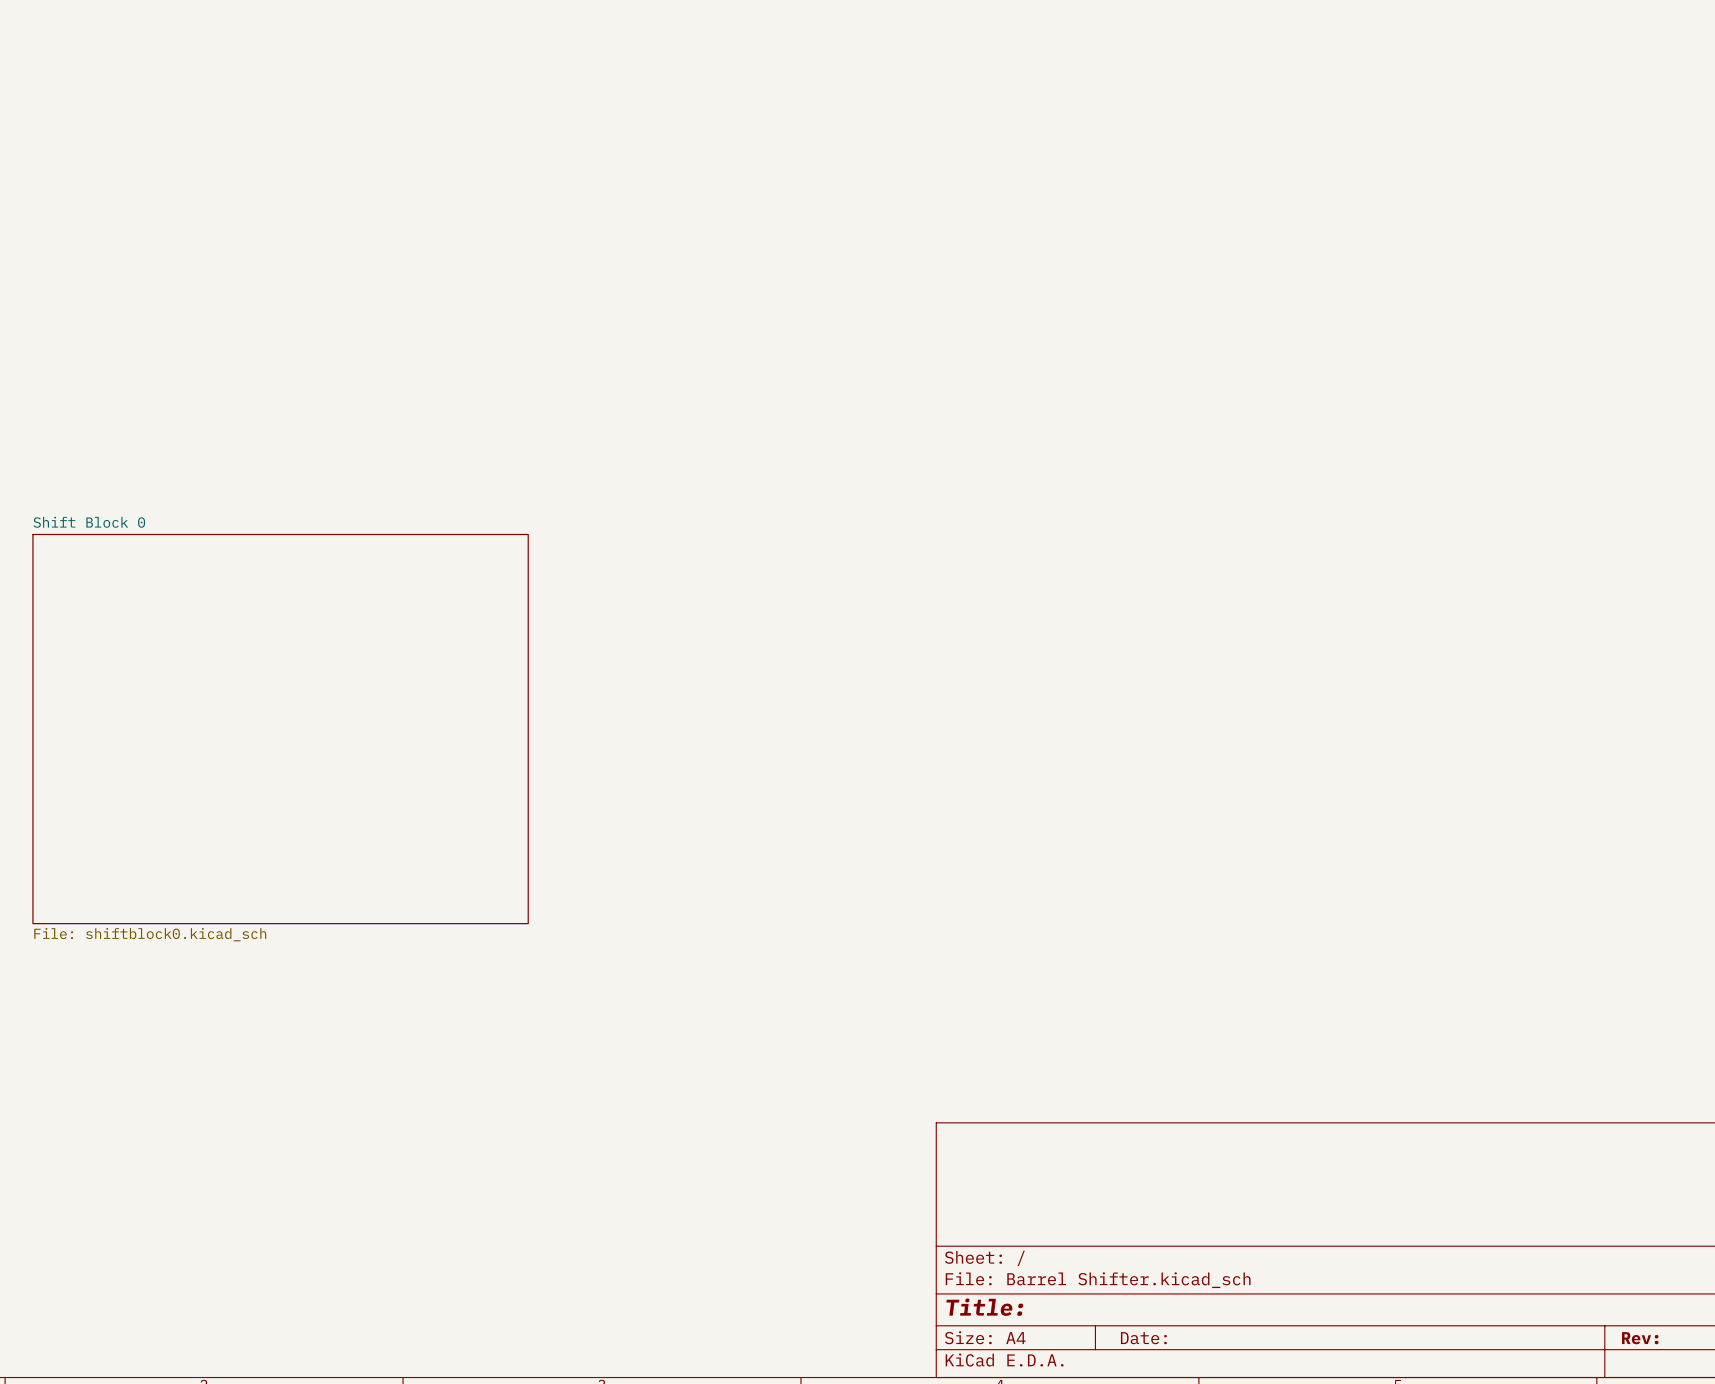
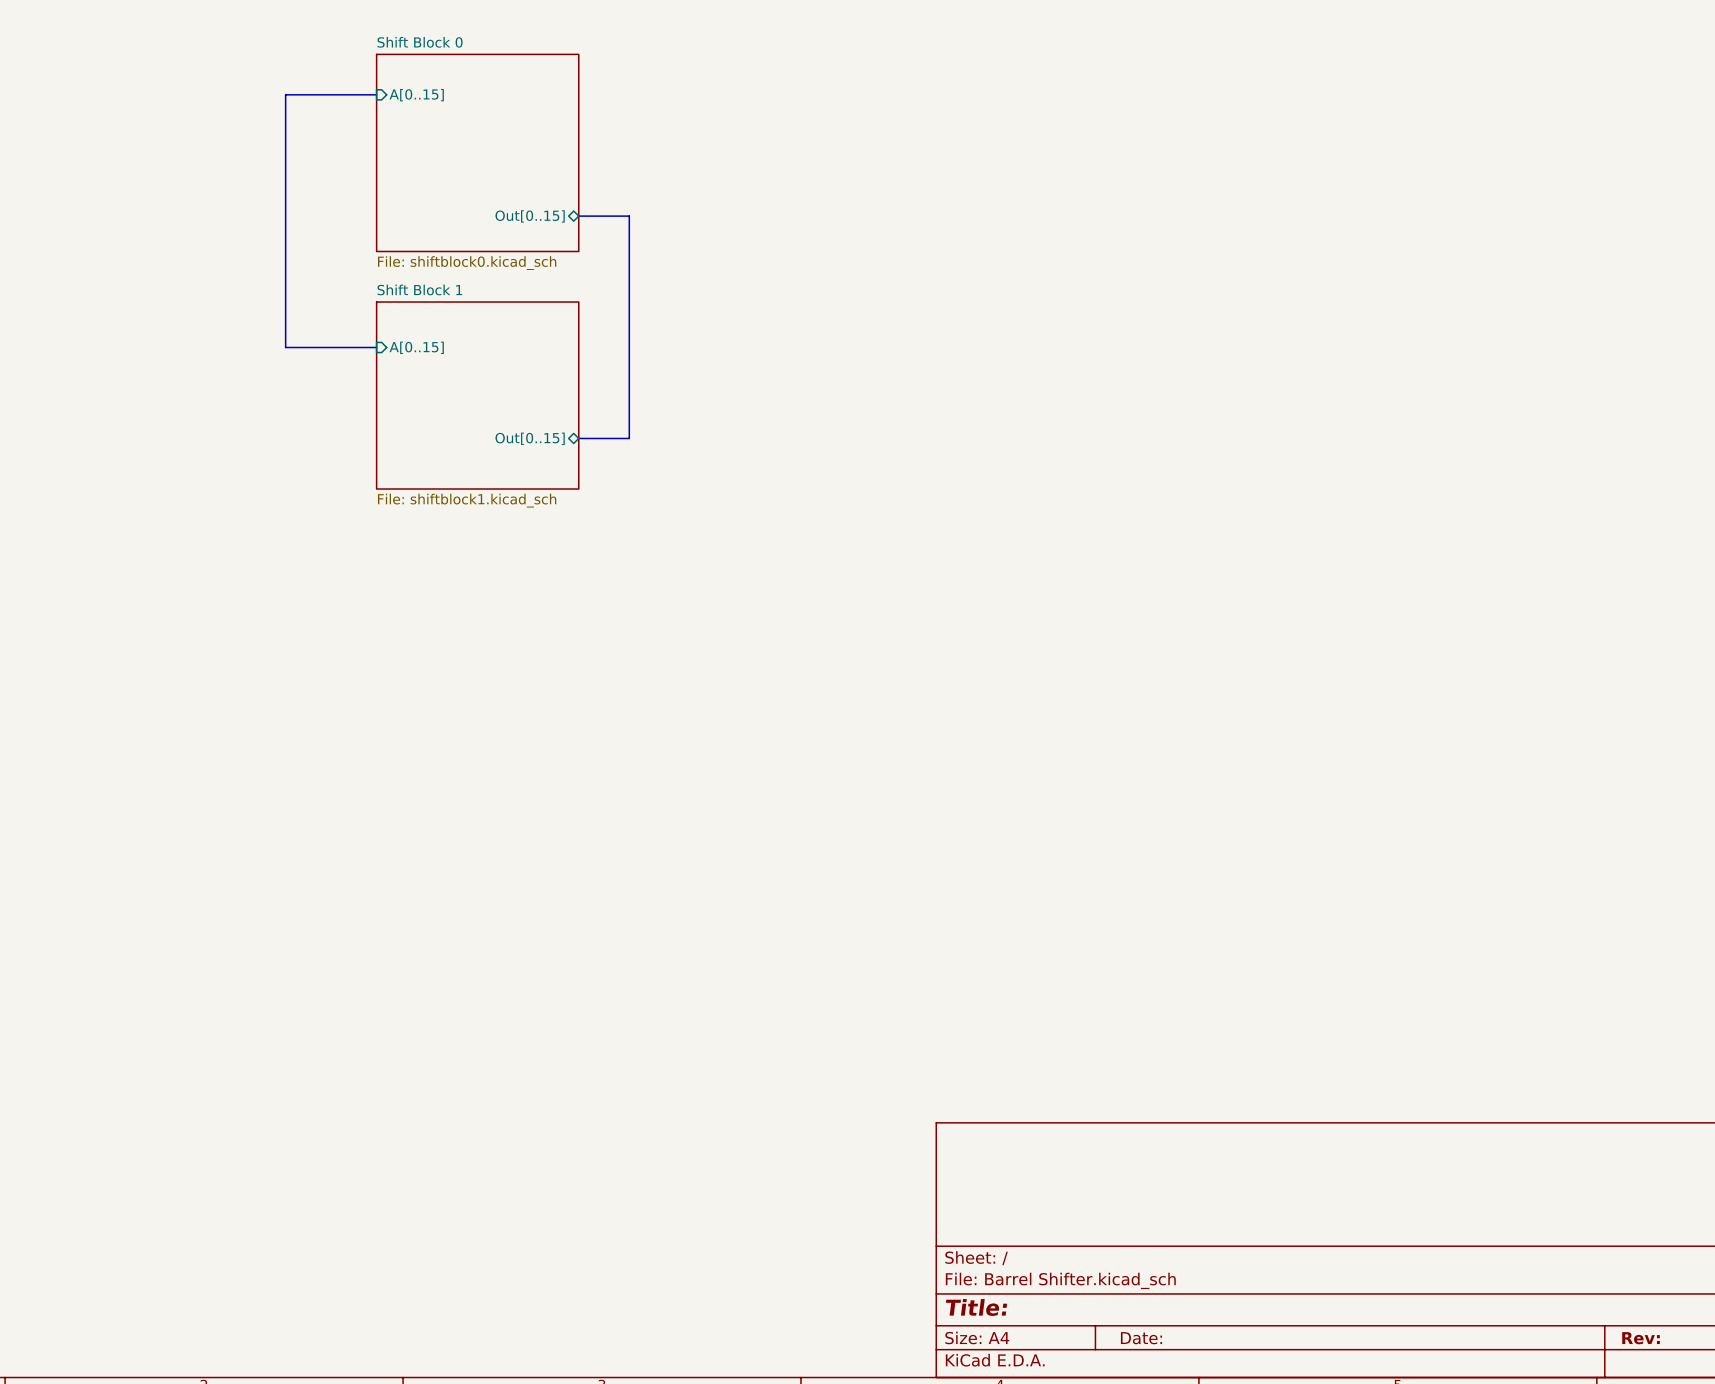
bus: none -> (376, 94) (285, 94) (285, 347) (376, 347)
sheet pin: none -> A[0..15] (416, 95)
sheet pin: none -> Out[0..15] (530, 216)
bus: none -> (578, 216) (629, 216) (629, 438) (578, 438)
sheet pin: none -> A[0..15] (416, 347)
sheet Shift Block 1: none -> File: shiftblock1.kicad_sch (477, 395)
sheet pin: none -> Out[0..15] (530, 438)
sheet Shift Block 0 name position: Shift Block 0 (89, 522) -> Shift Block 0 (420, 42)
sheet Shift Block 0 shape: [32, 533, 529, 925] -> [376, 53, 580, 253]
sheet Shift Block 0 value position: File: shiftblock0.kicad_sch (150, 934) -> File: shiftblock0.kicad_sch (467, 263)

